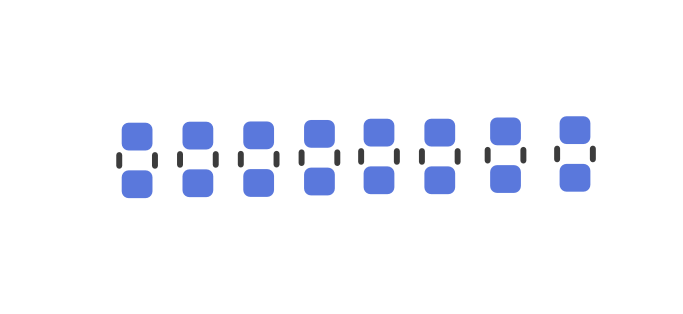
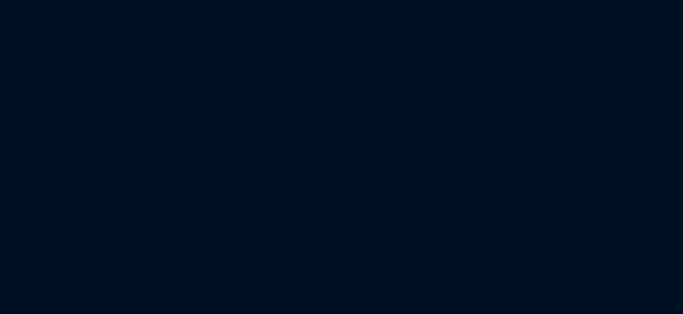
part: (574, 153) -> none
part: (505, 155) -> none
part: (378, 156) -> none
part: (439, 156) -> none
part: (319, 157) -> none
part: (197, 159) -> none
part: (258, 159) -> none
part: (137, 160) -> none

